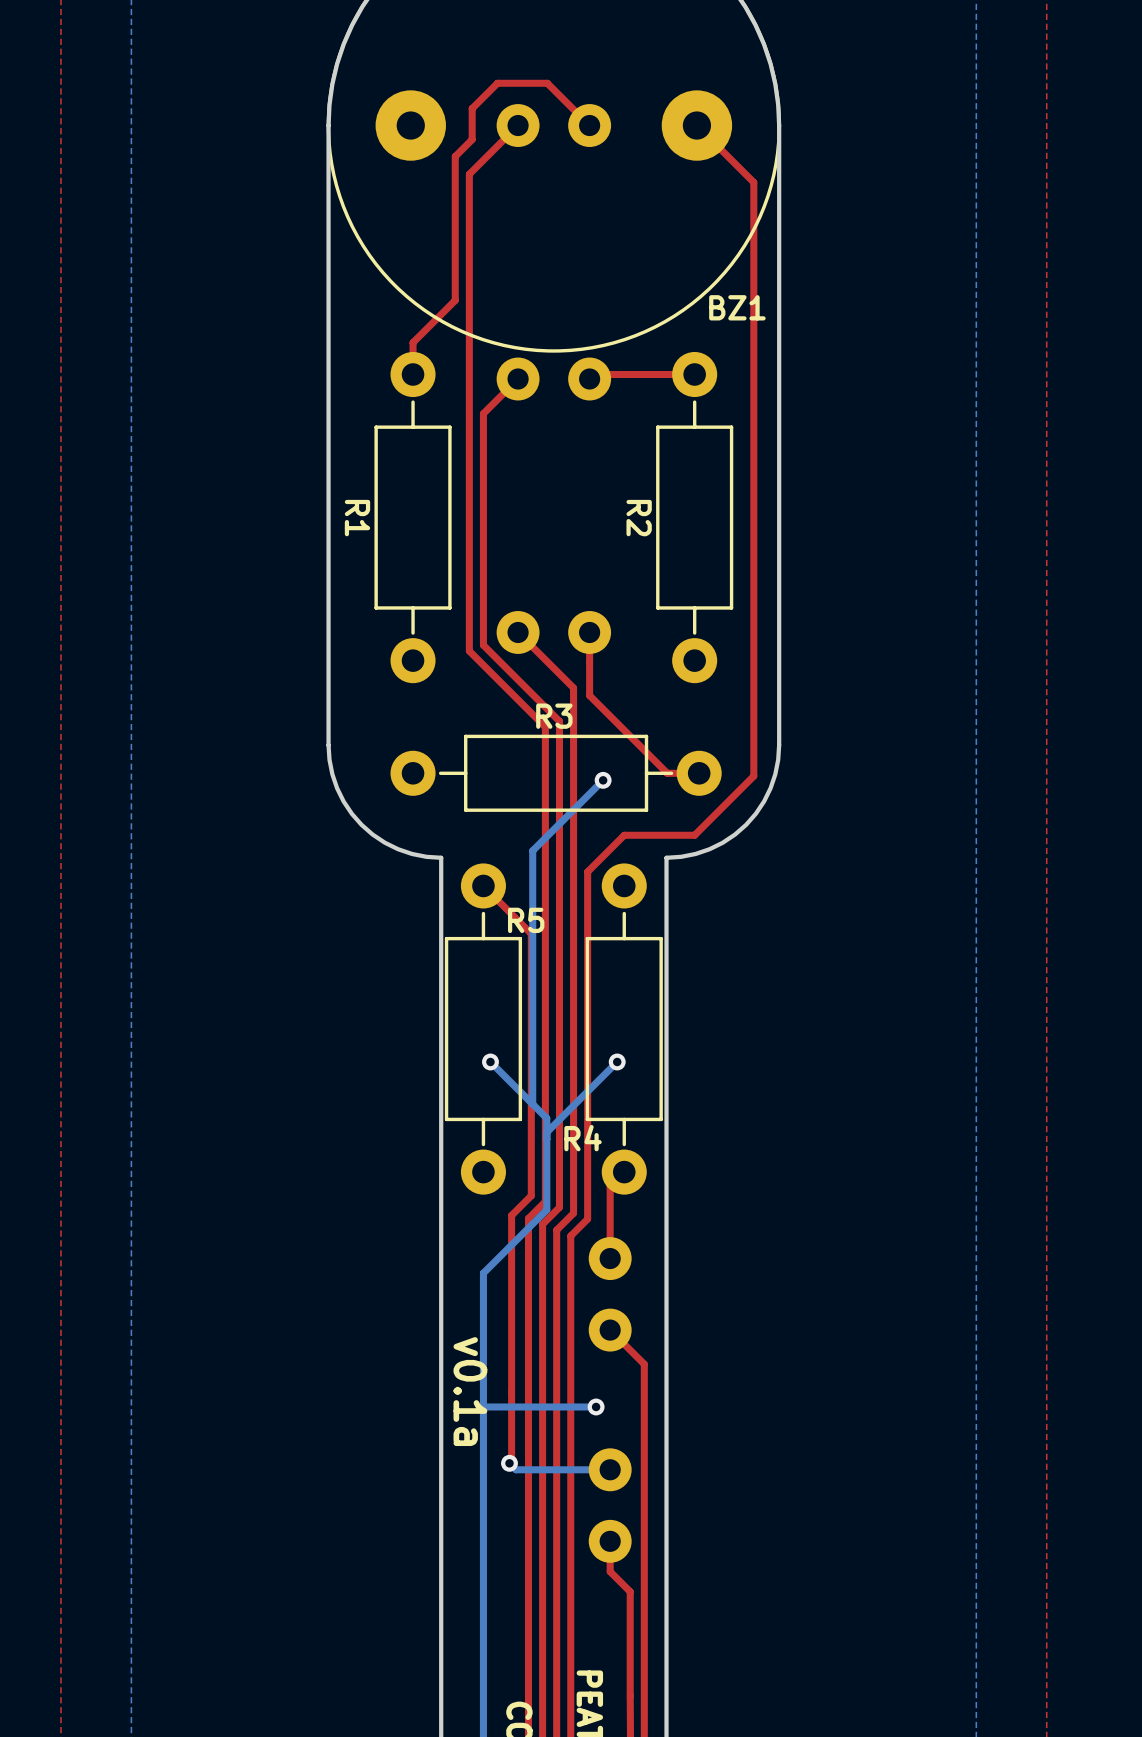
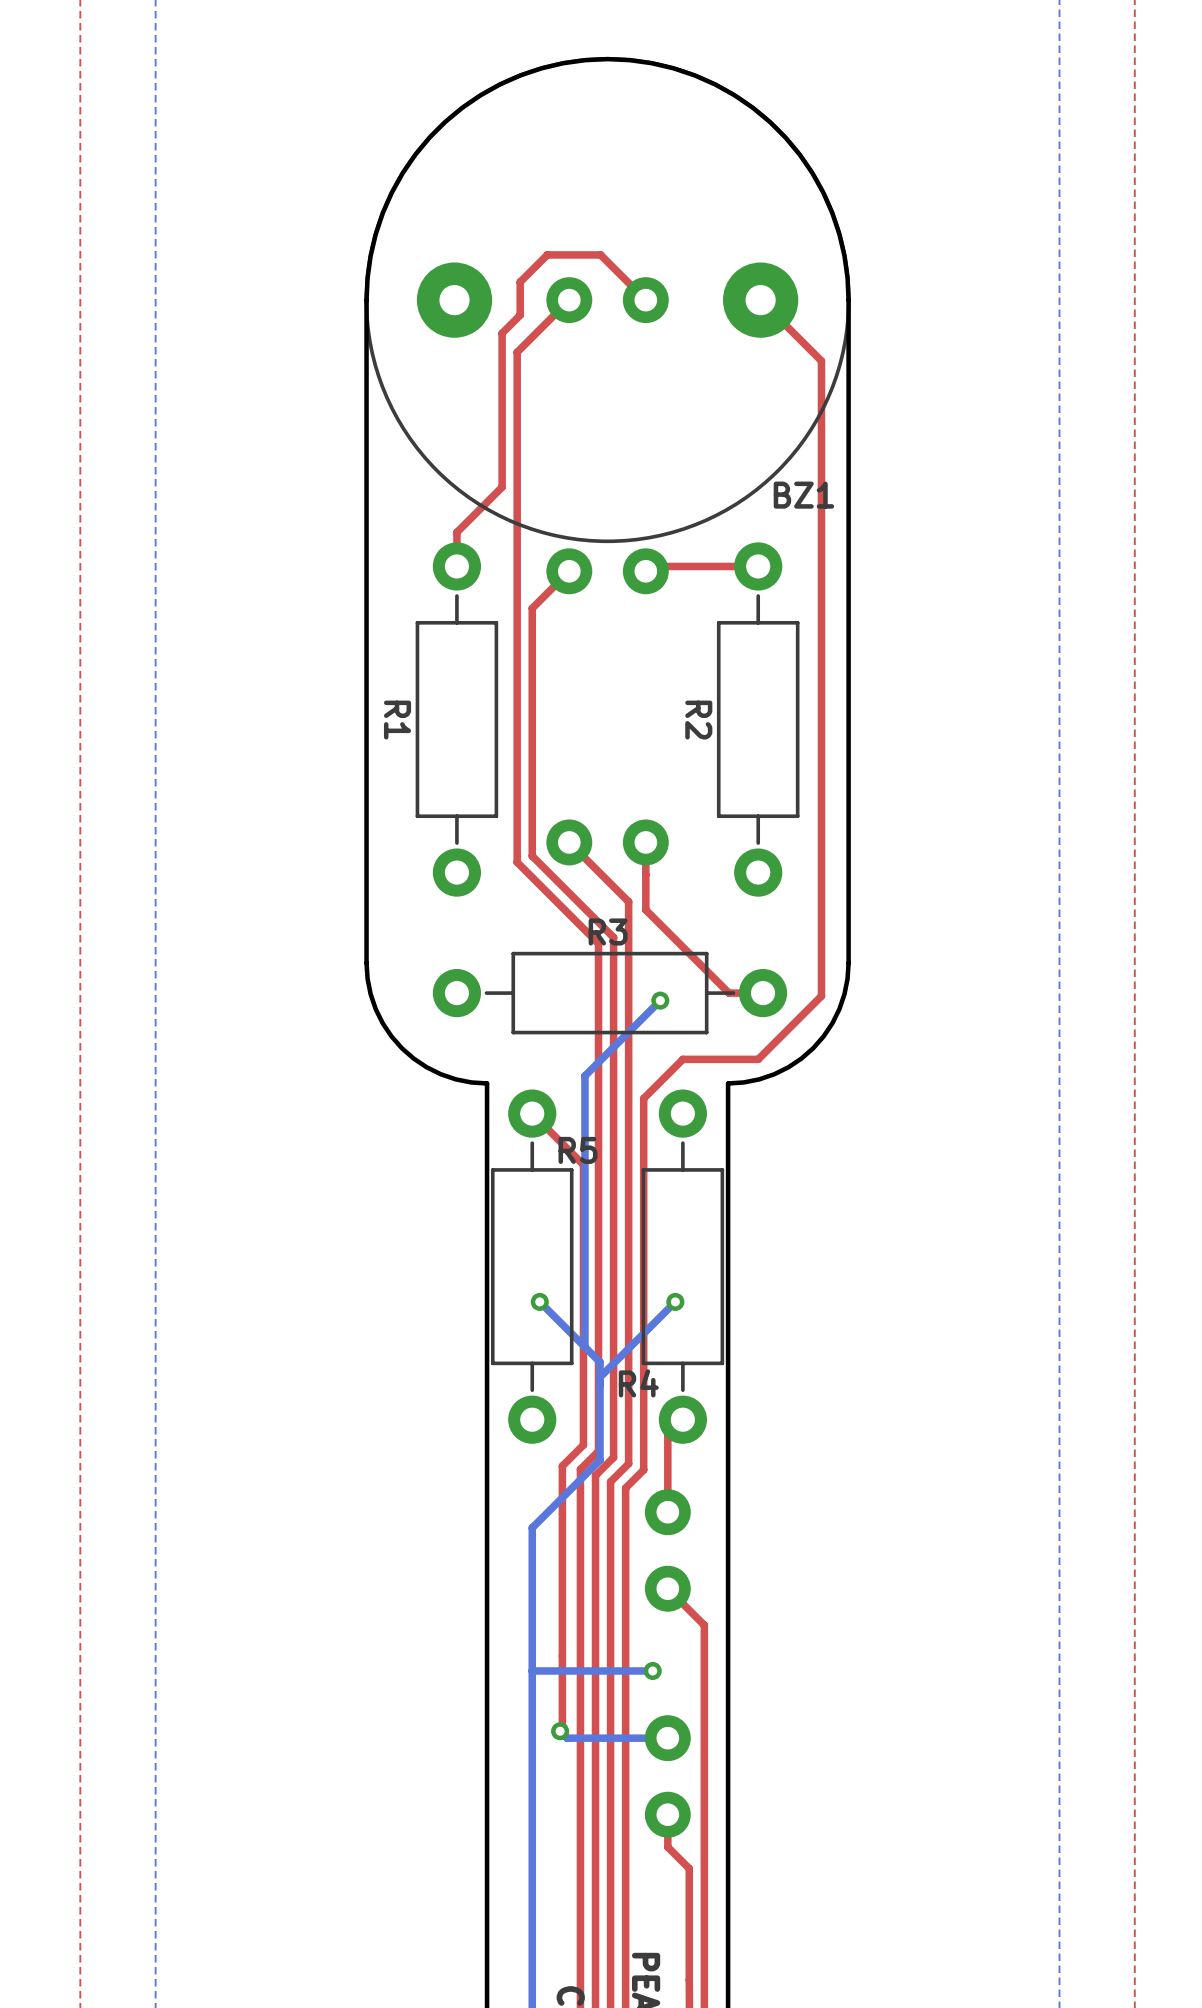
text: v0.1a (470, 1391) -> none

